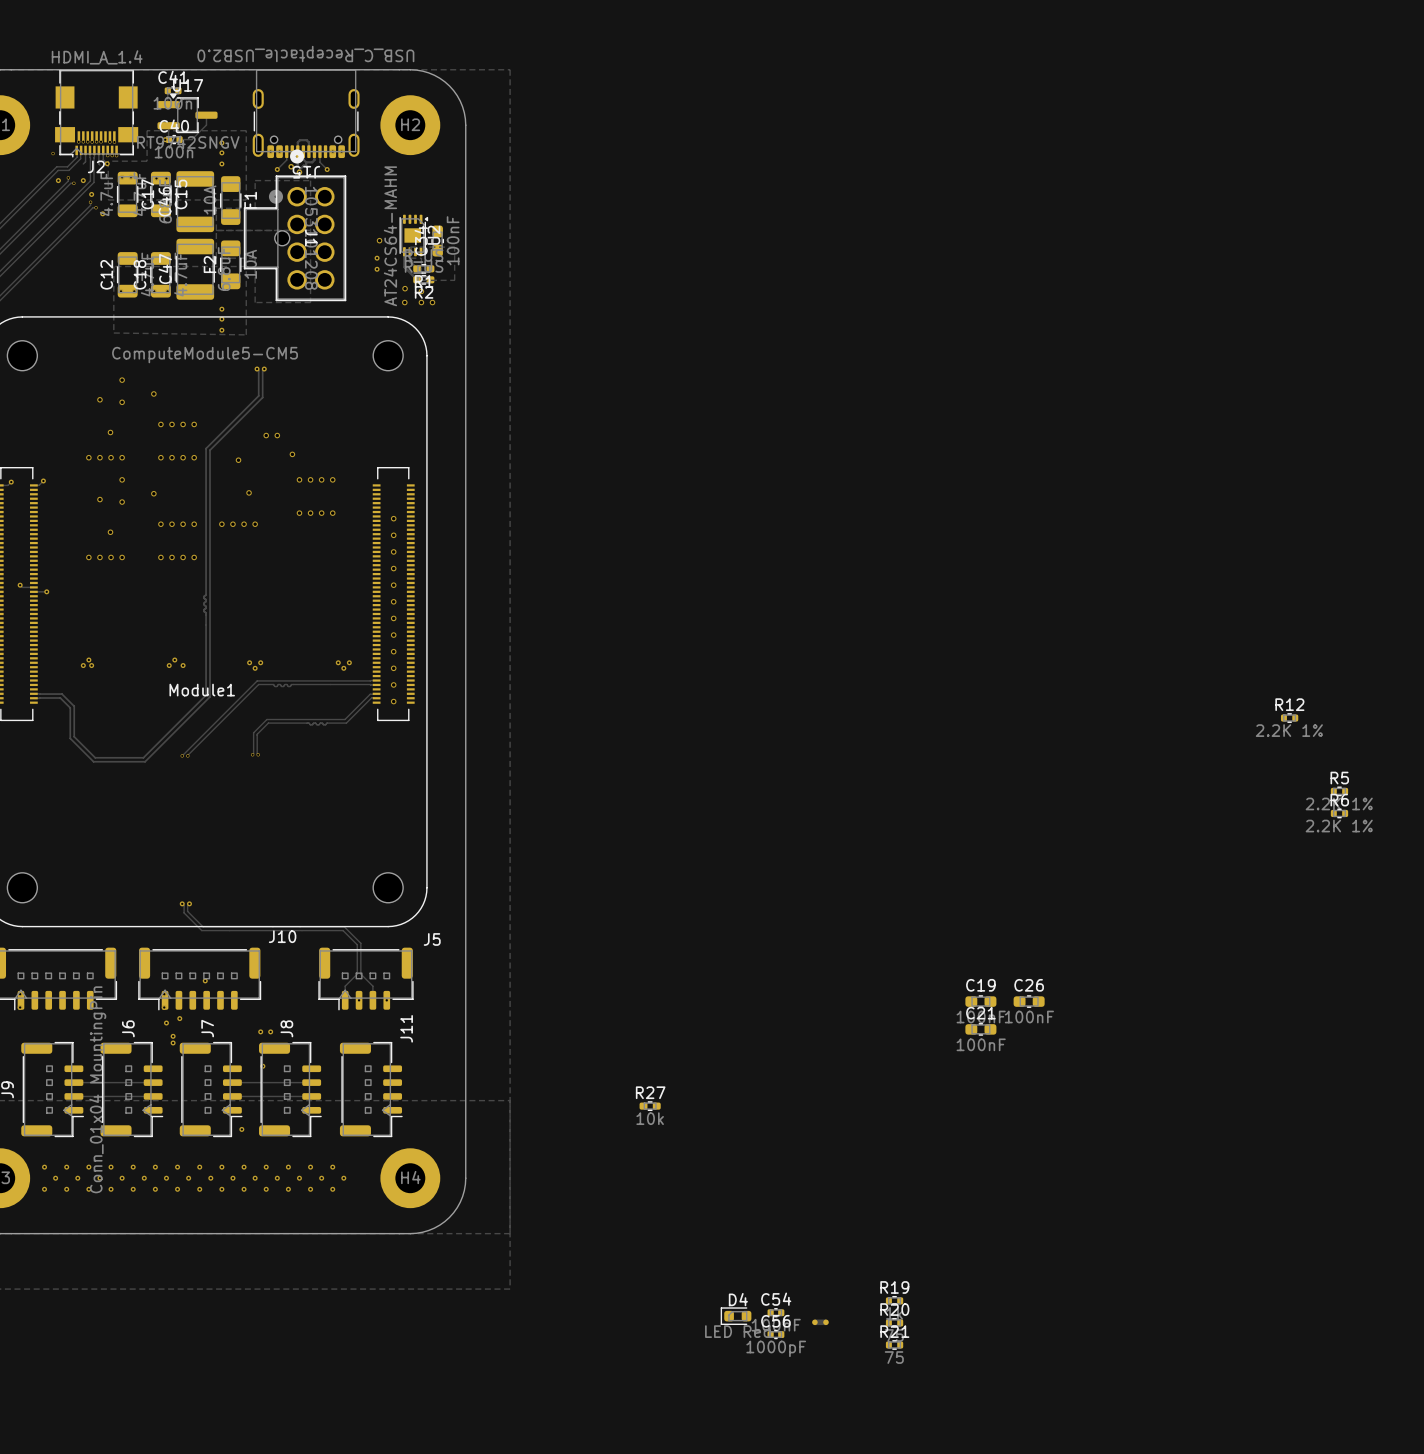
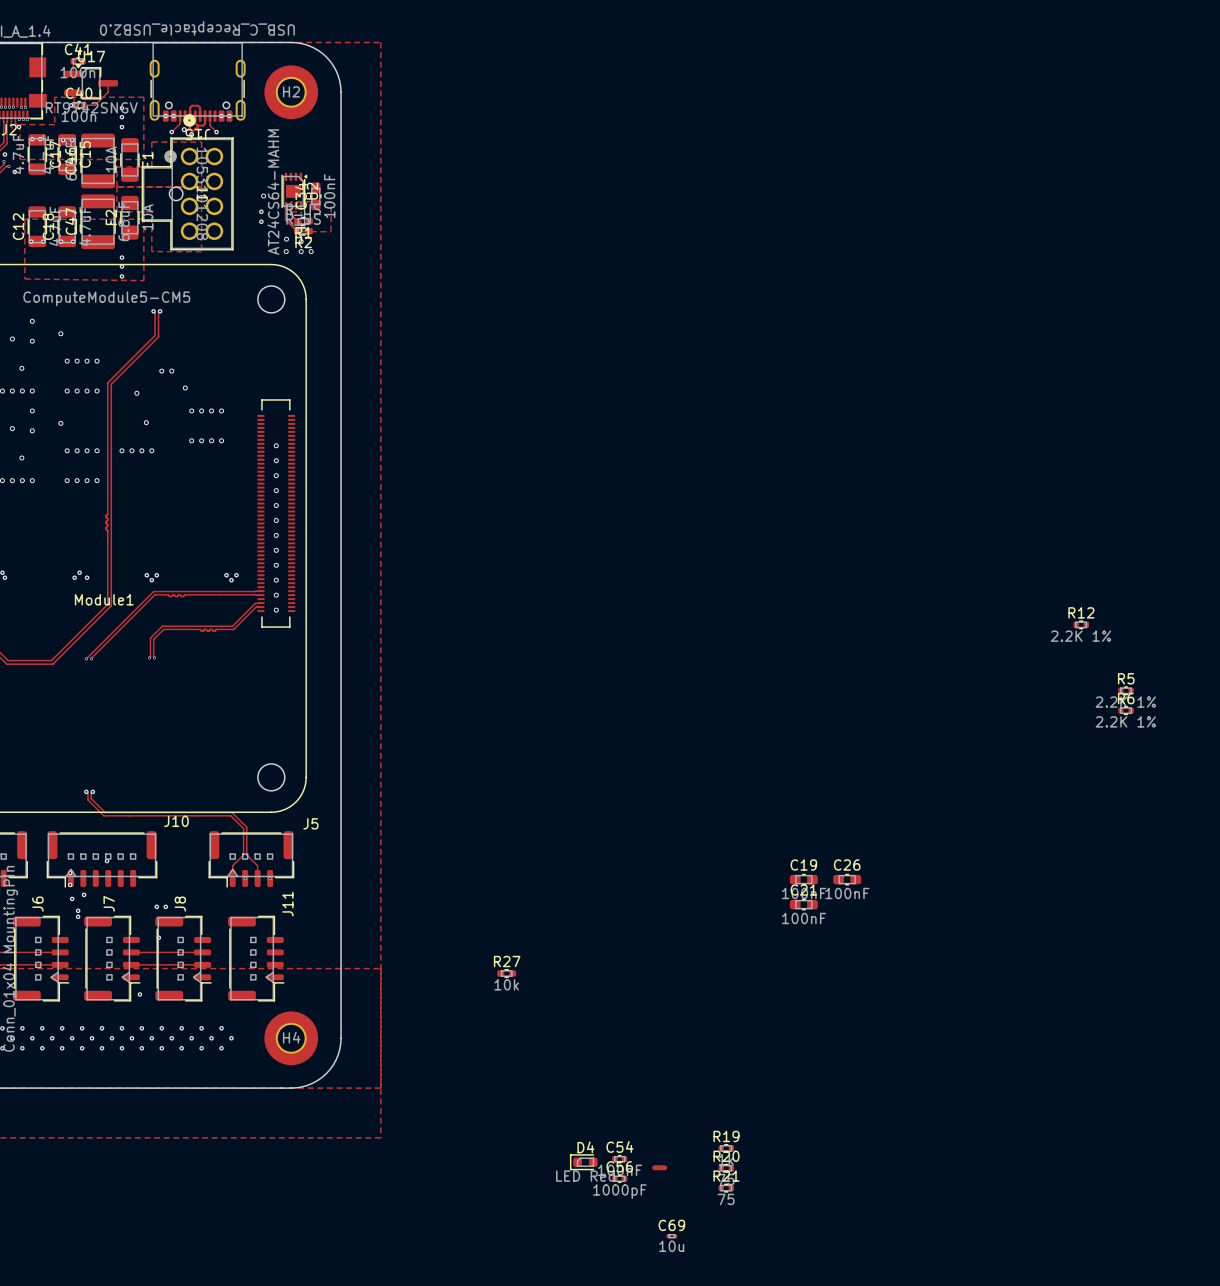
C69: none -> 10u (671, 1236)

